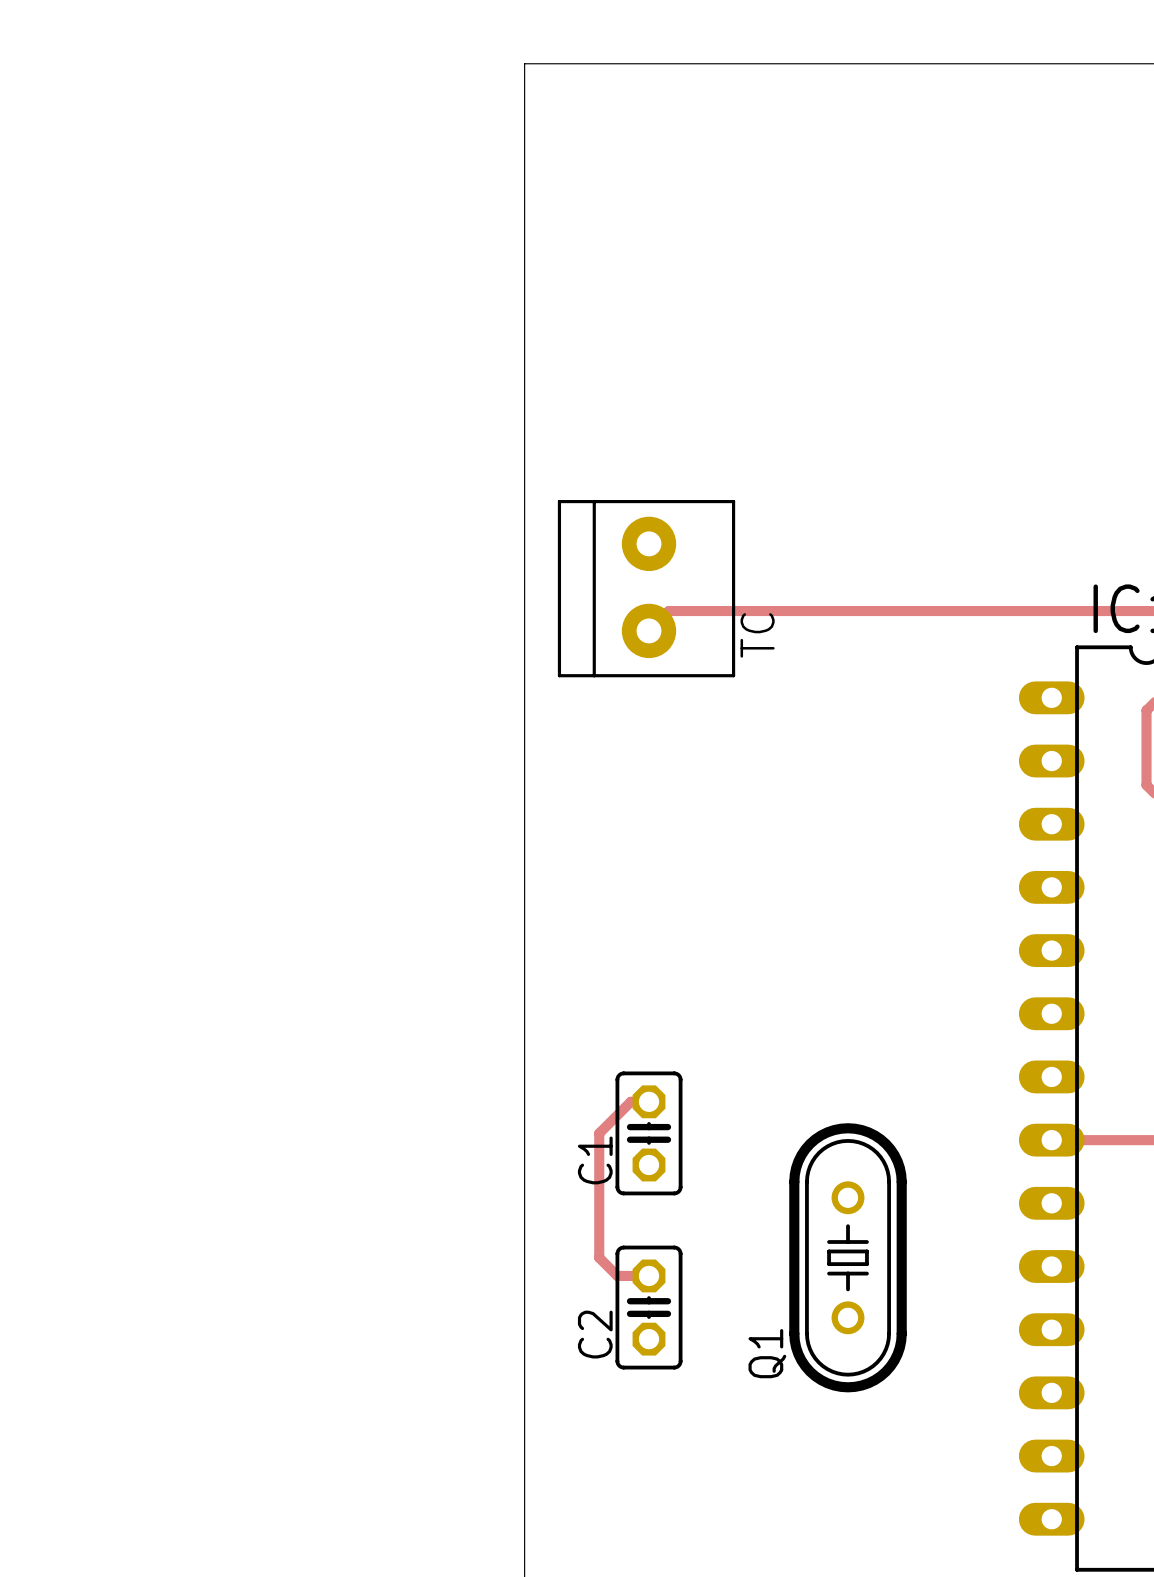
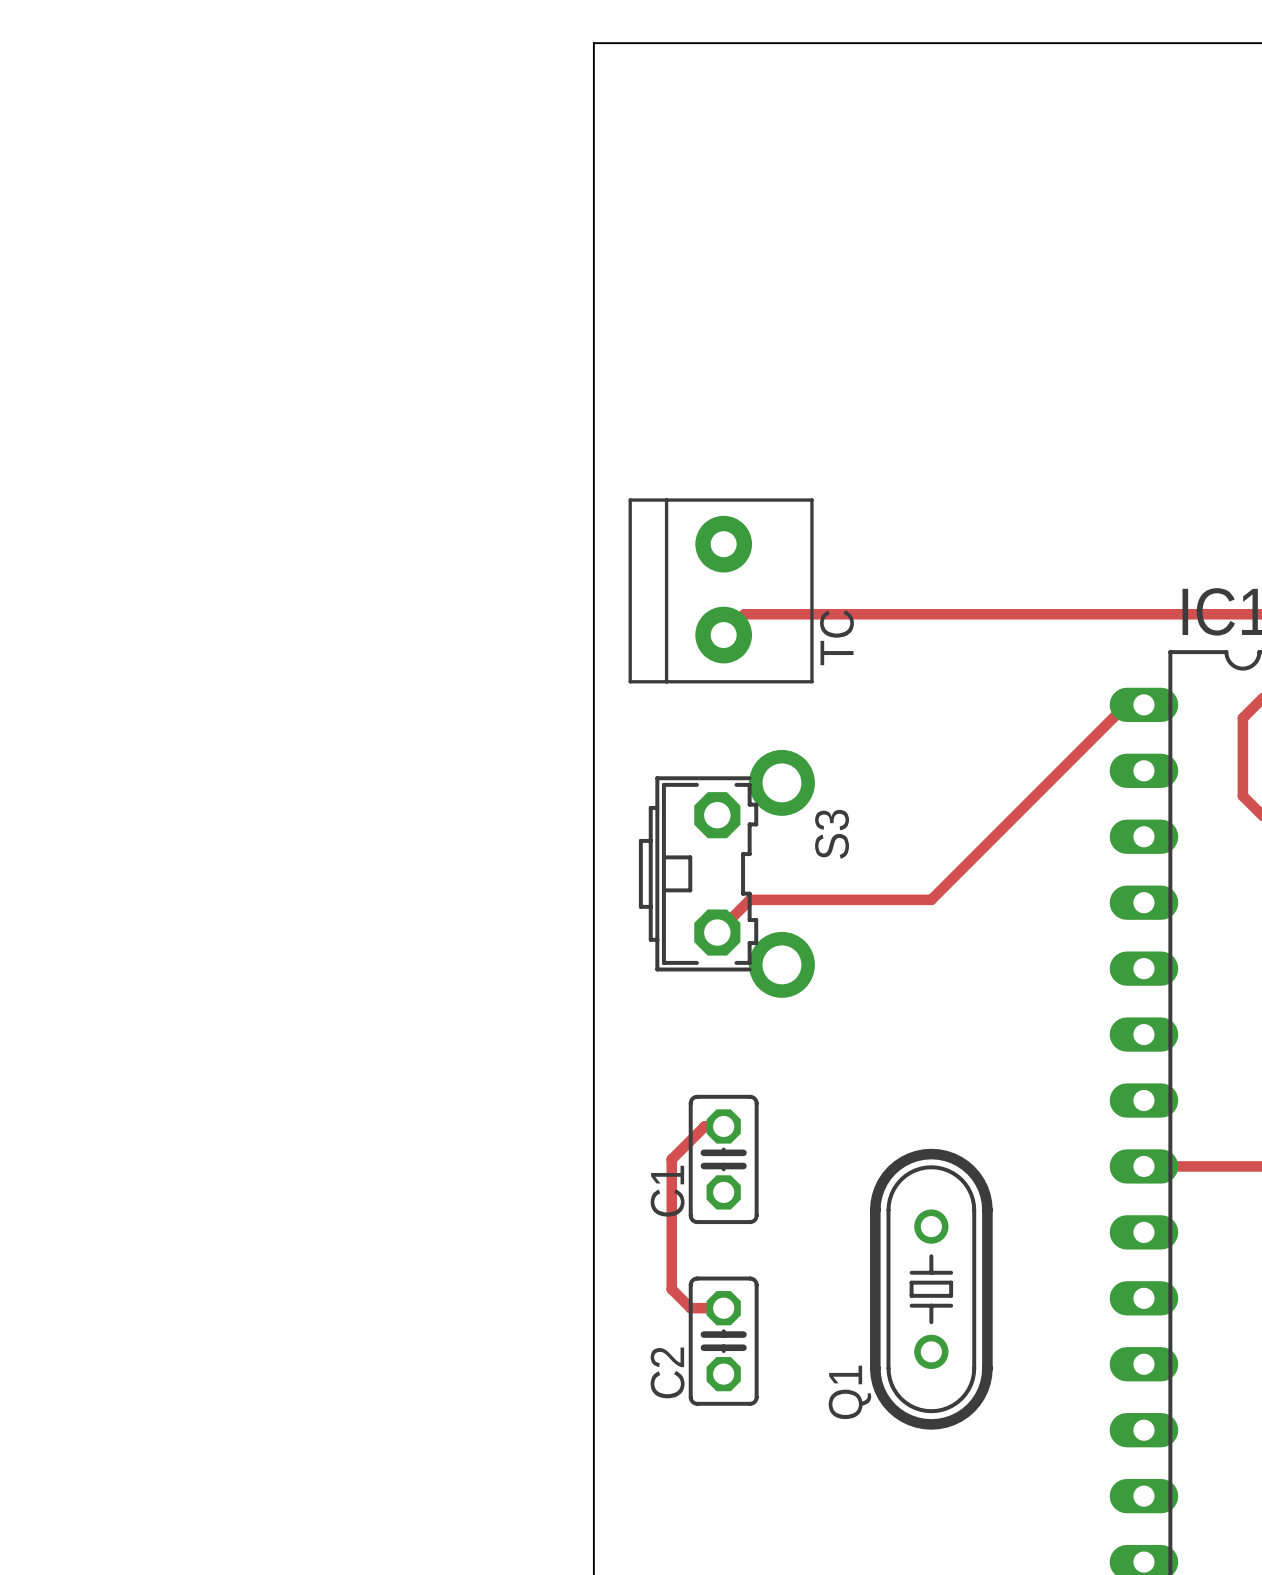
track: none -> (1143, 704) (1126, 704) (931, 899) (750, 899) (717, 932)
S3: none -> (726, 873)

